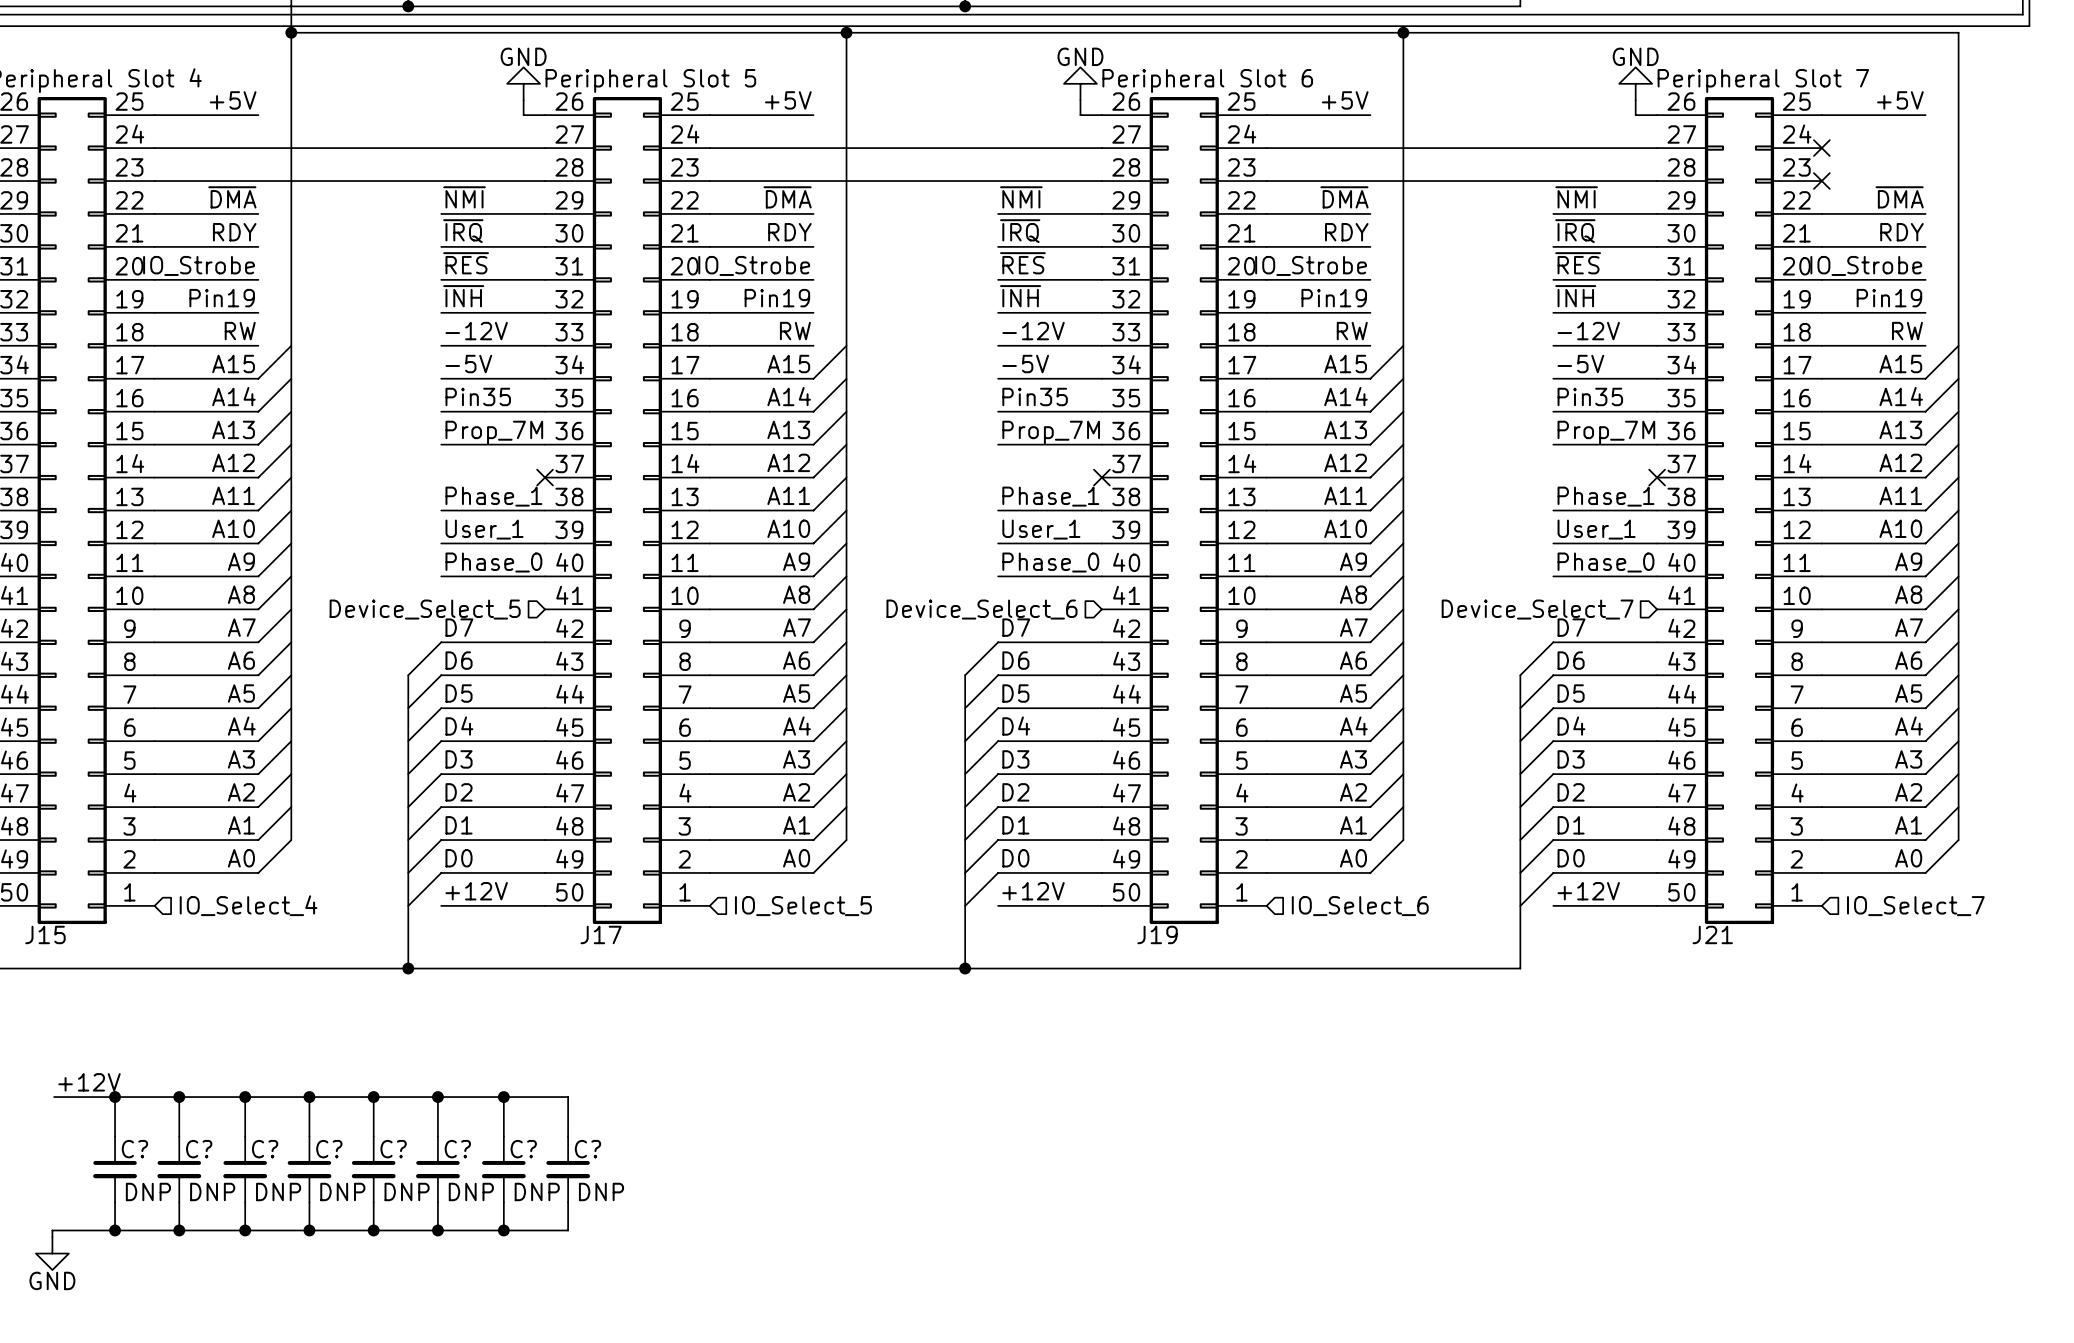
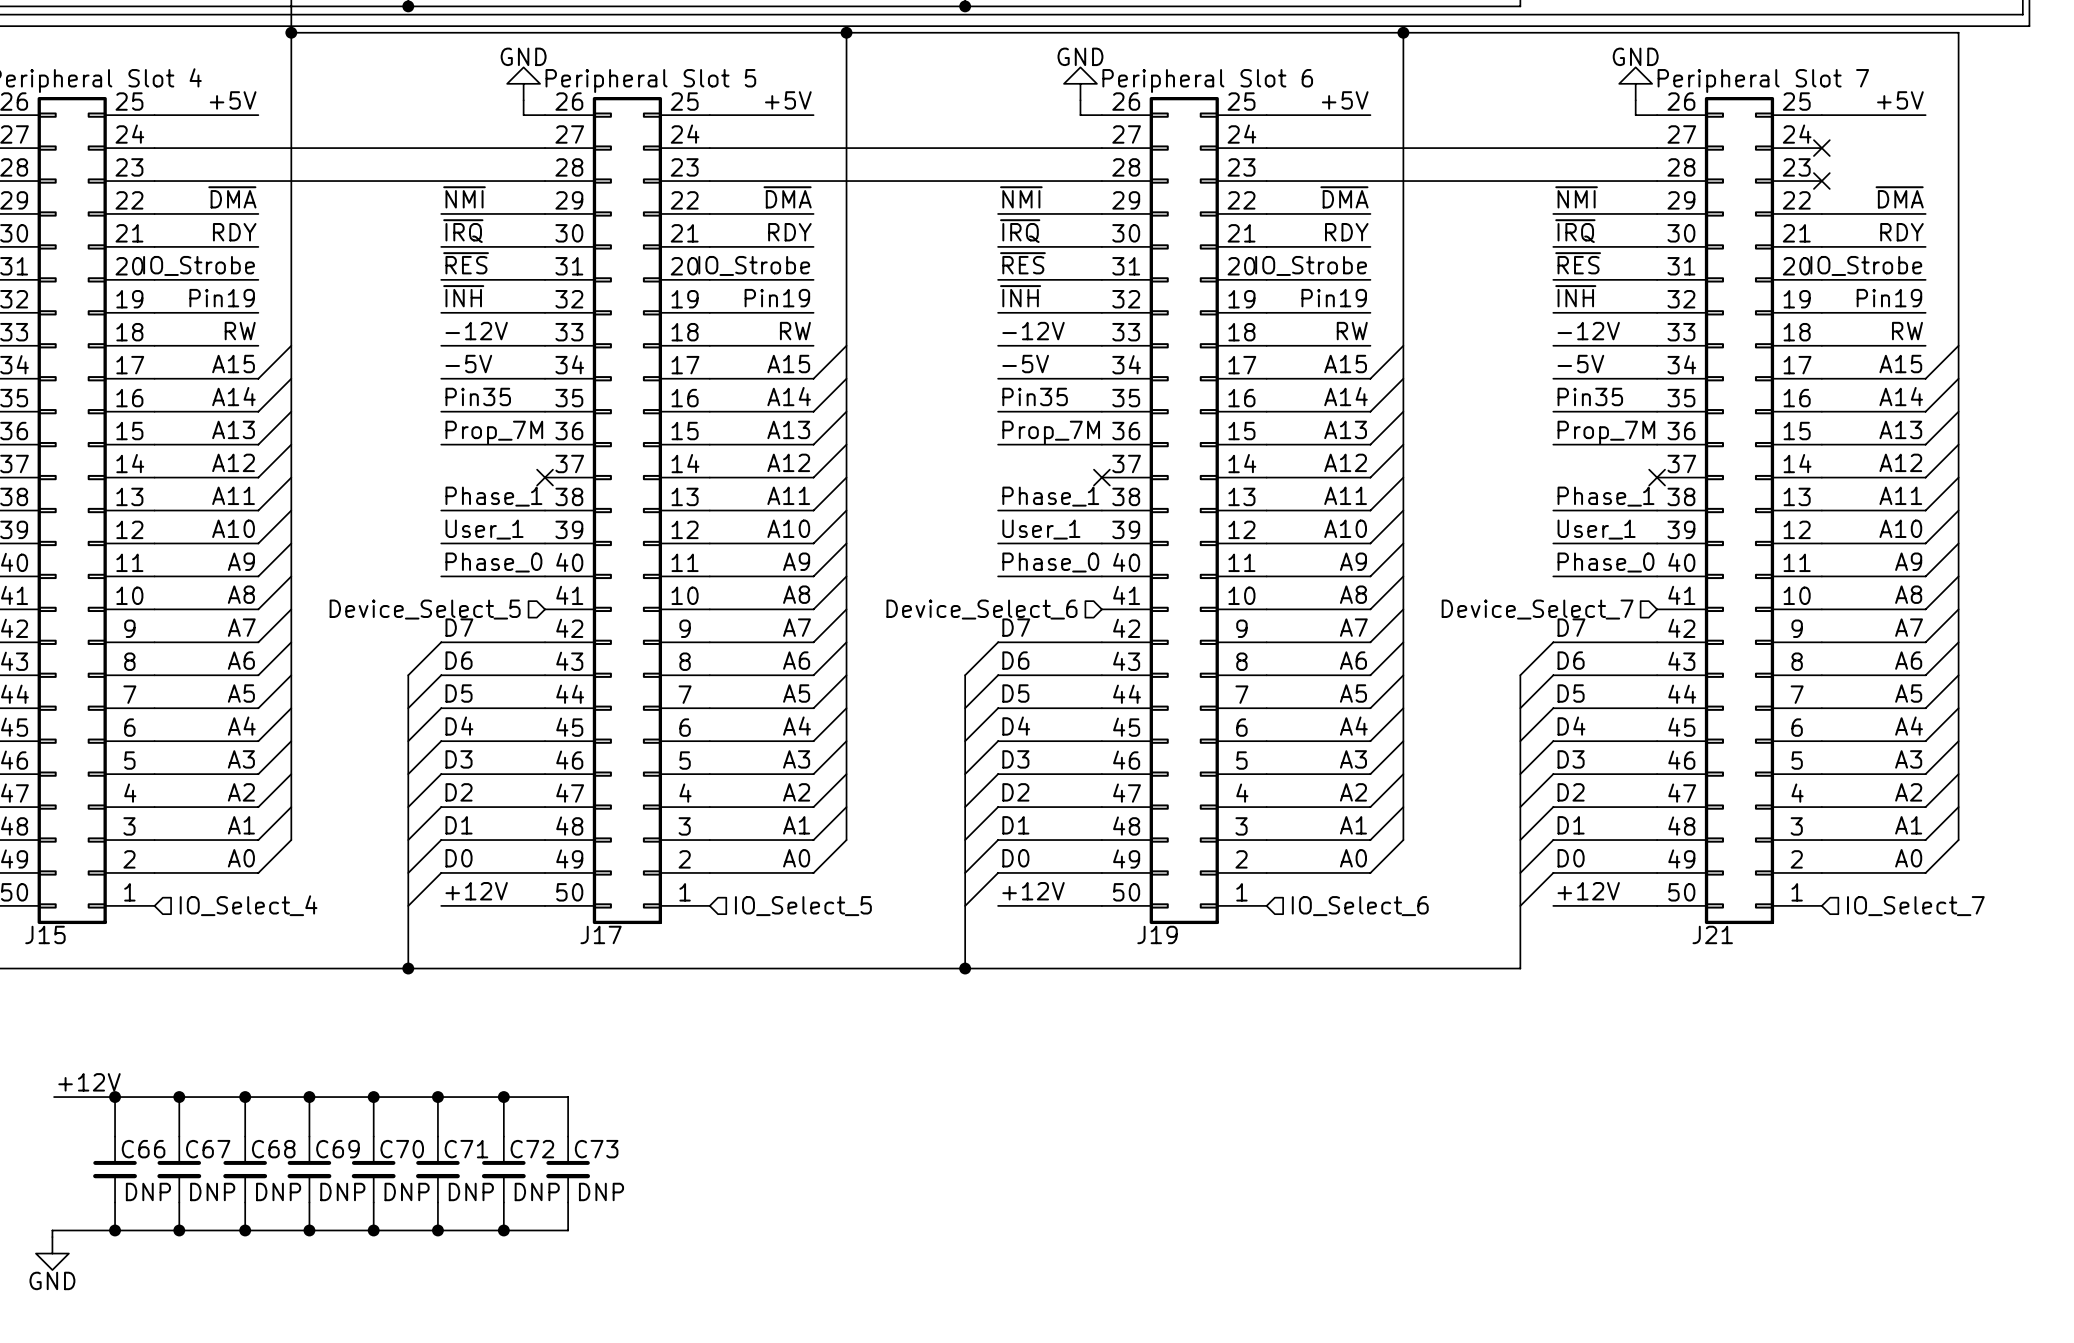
C? name: C? (134, 1149) -> C66 (143, 1149)
C? name: C? (199, 1149) -> C67 (208, 1149)
C? name: C? (265, 1149) -> C68 (273, 1149)
C? name: C? (329, 1149) -> C69 (337, 1149)
C? name: C? (393, 1149) -> C70 (402, 1149)
C? name: C? (457, 1149) -> C71 (466, 1149)
C? name: C? (523, 1149) -> C72 (532, 1149)
C? name: C? (587, 1149) -> C73 (596, 1149)

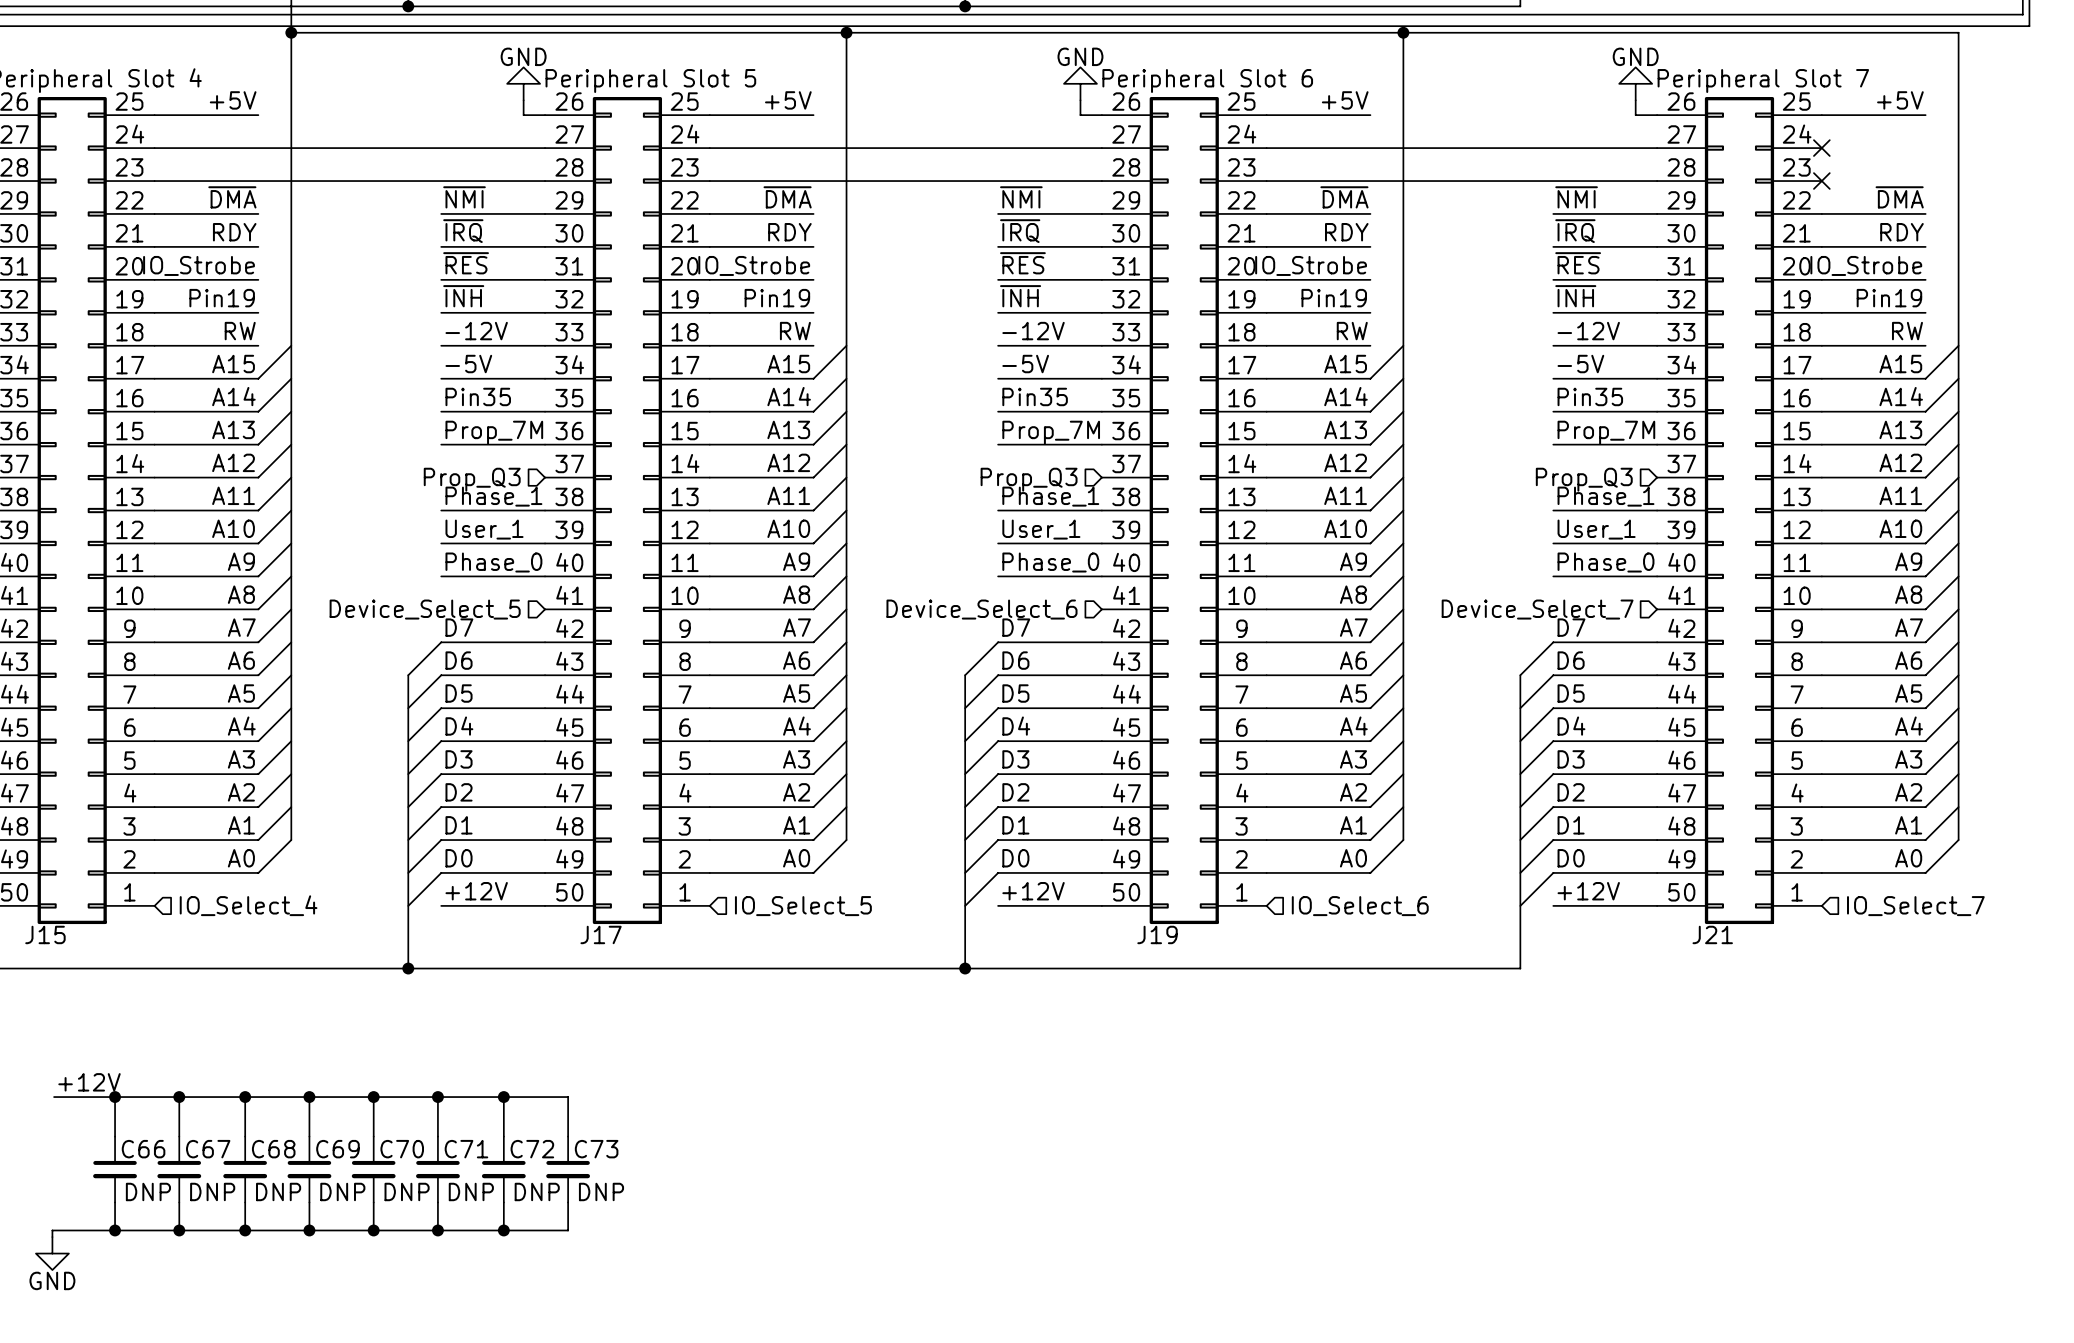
no-connect mark: (545, 477) -> none
no-connect mark: (1101, 477) -> none
no-connect mark: (1657, 477) -> none
hierarchical label: none -> Prop_Q3 (472, 479)
hierarchical label: none -> Prop_Q3 (1029, 479)
hierarchical label: none -> Prop_Q3 (1584, 479)

